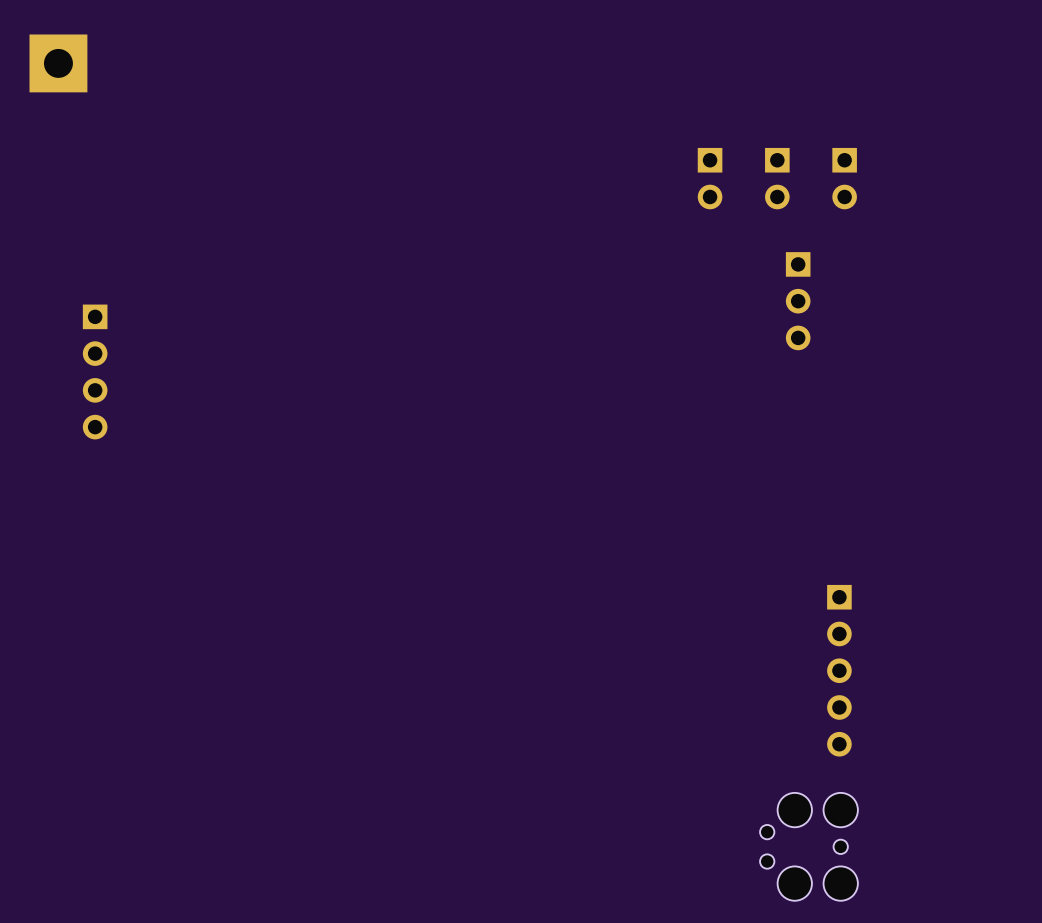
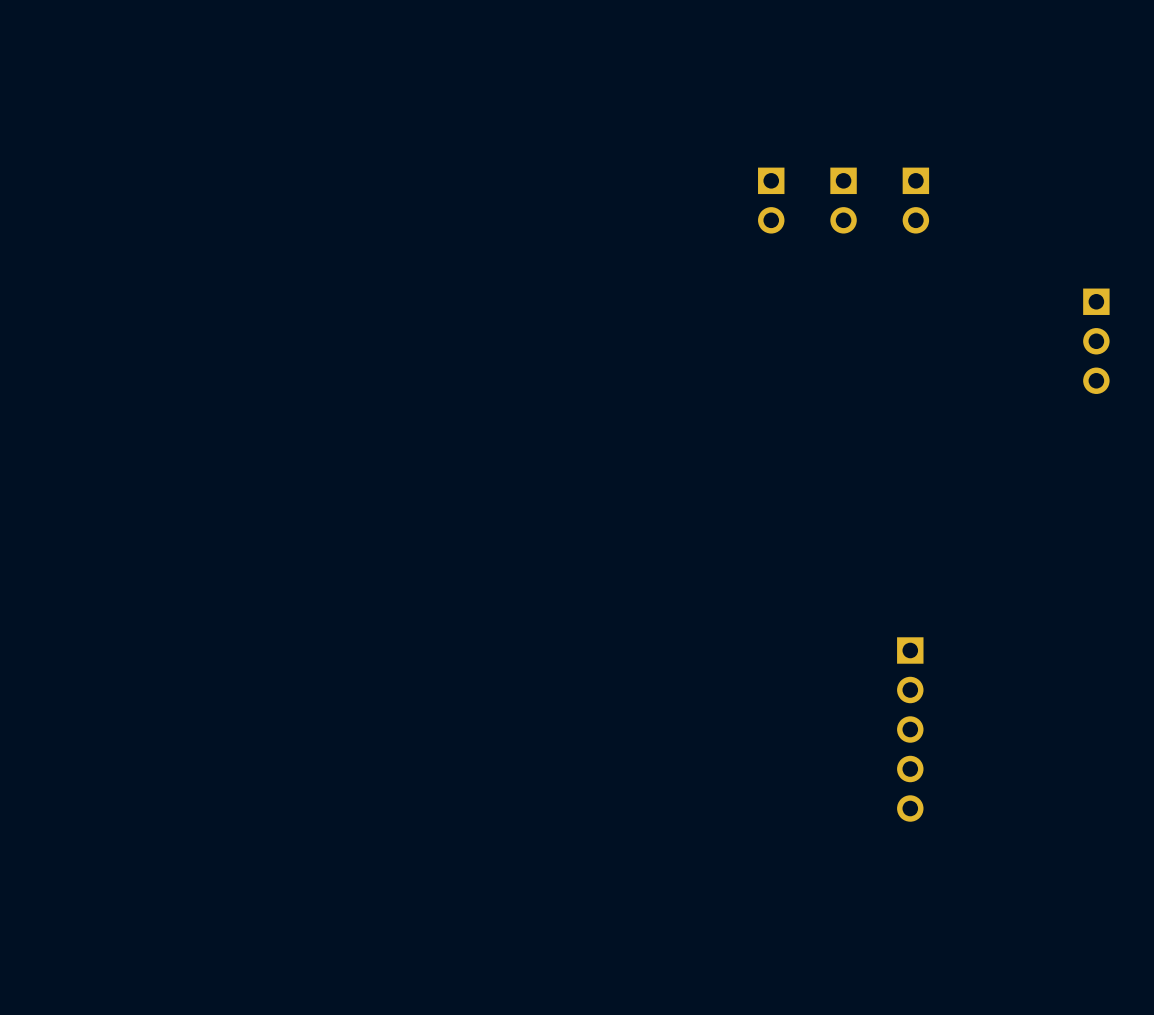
part: (58, 63) -> none
part position: (798, 301) -> (1096, 341)
part: (95, 371) -> none
part: (808, 846) -> none

